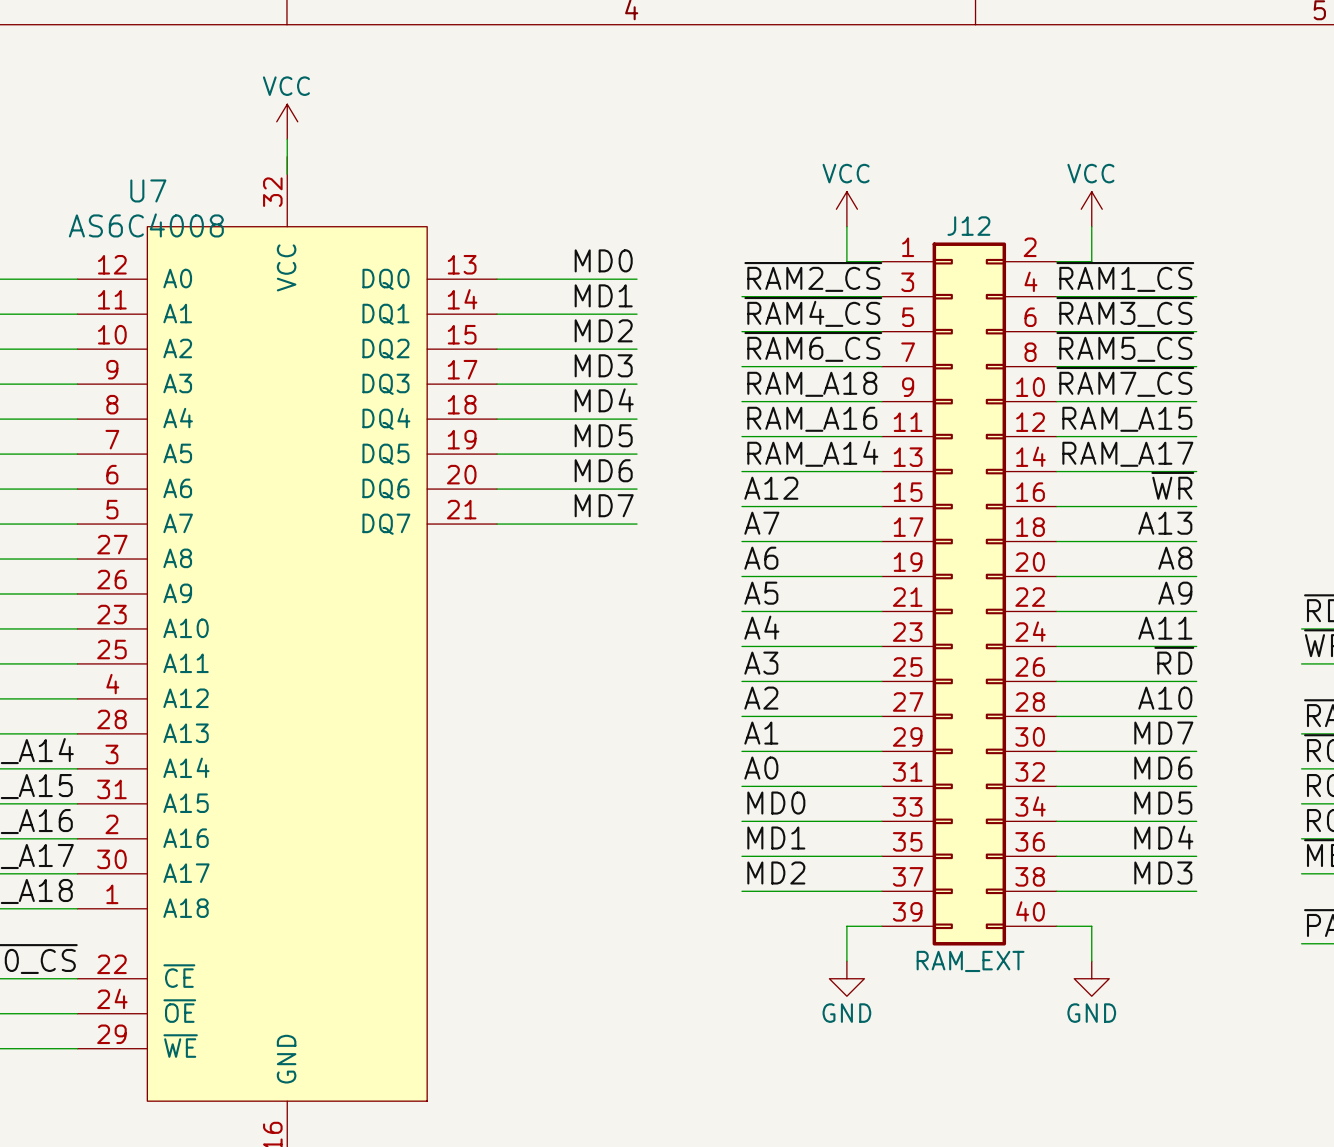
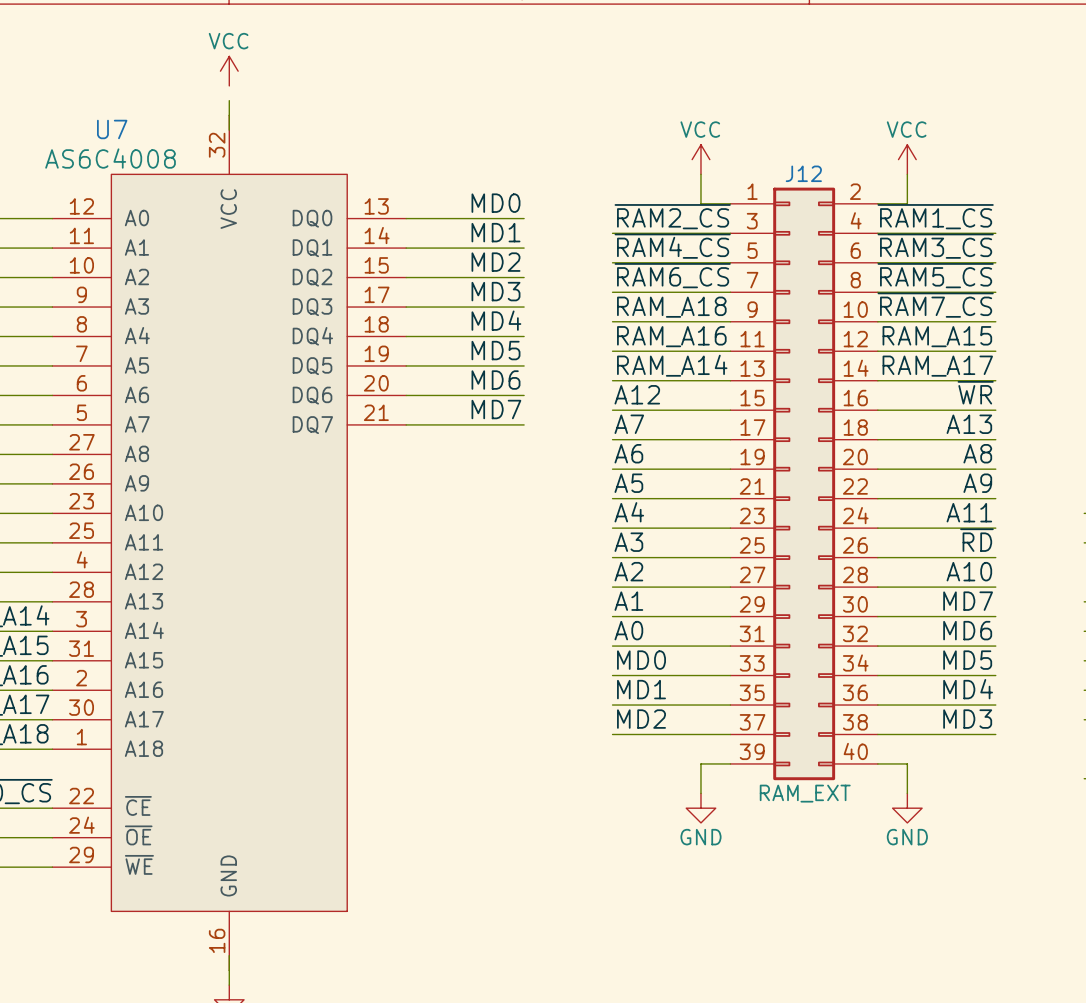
power symbol position: VCC (287, 121) -> VCC (229, 71)
U7 name position: U7 (148, 190) -> U7 (112, 129)
U7 value position: AS6C4008 (146, 225) -> AS6C4008 (110, 158)

